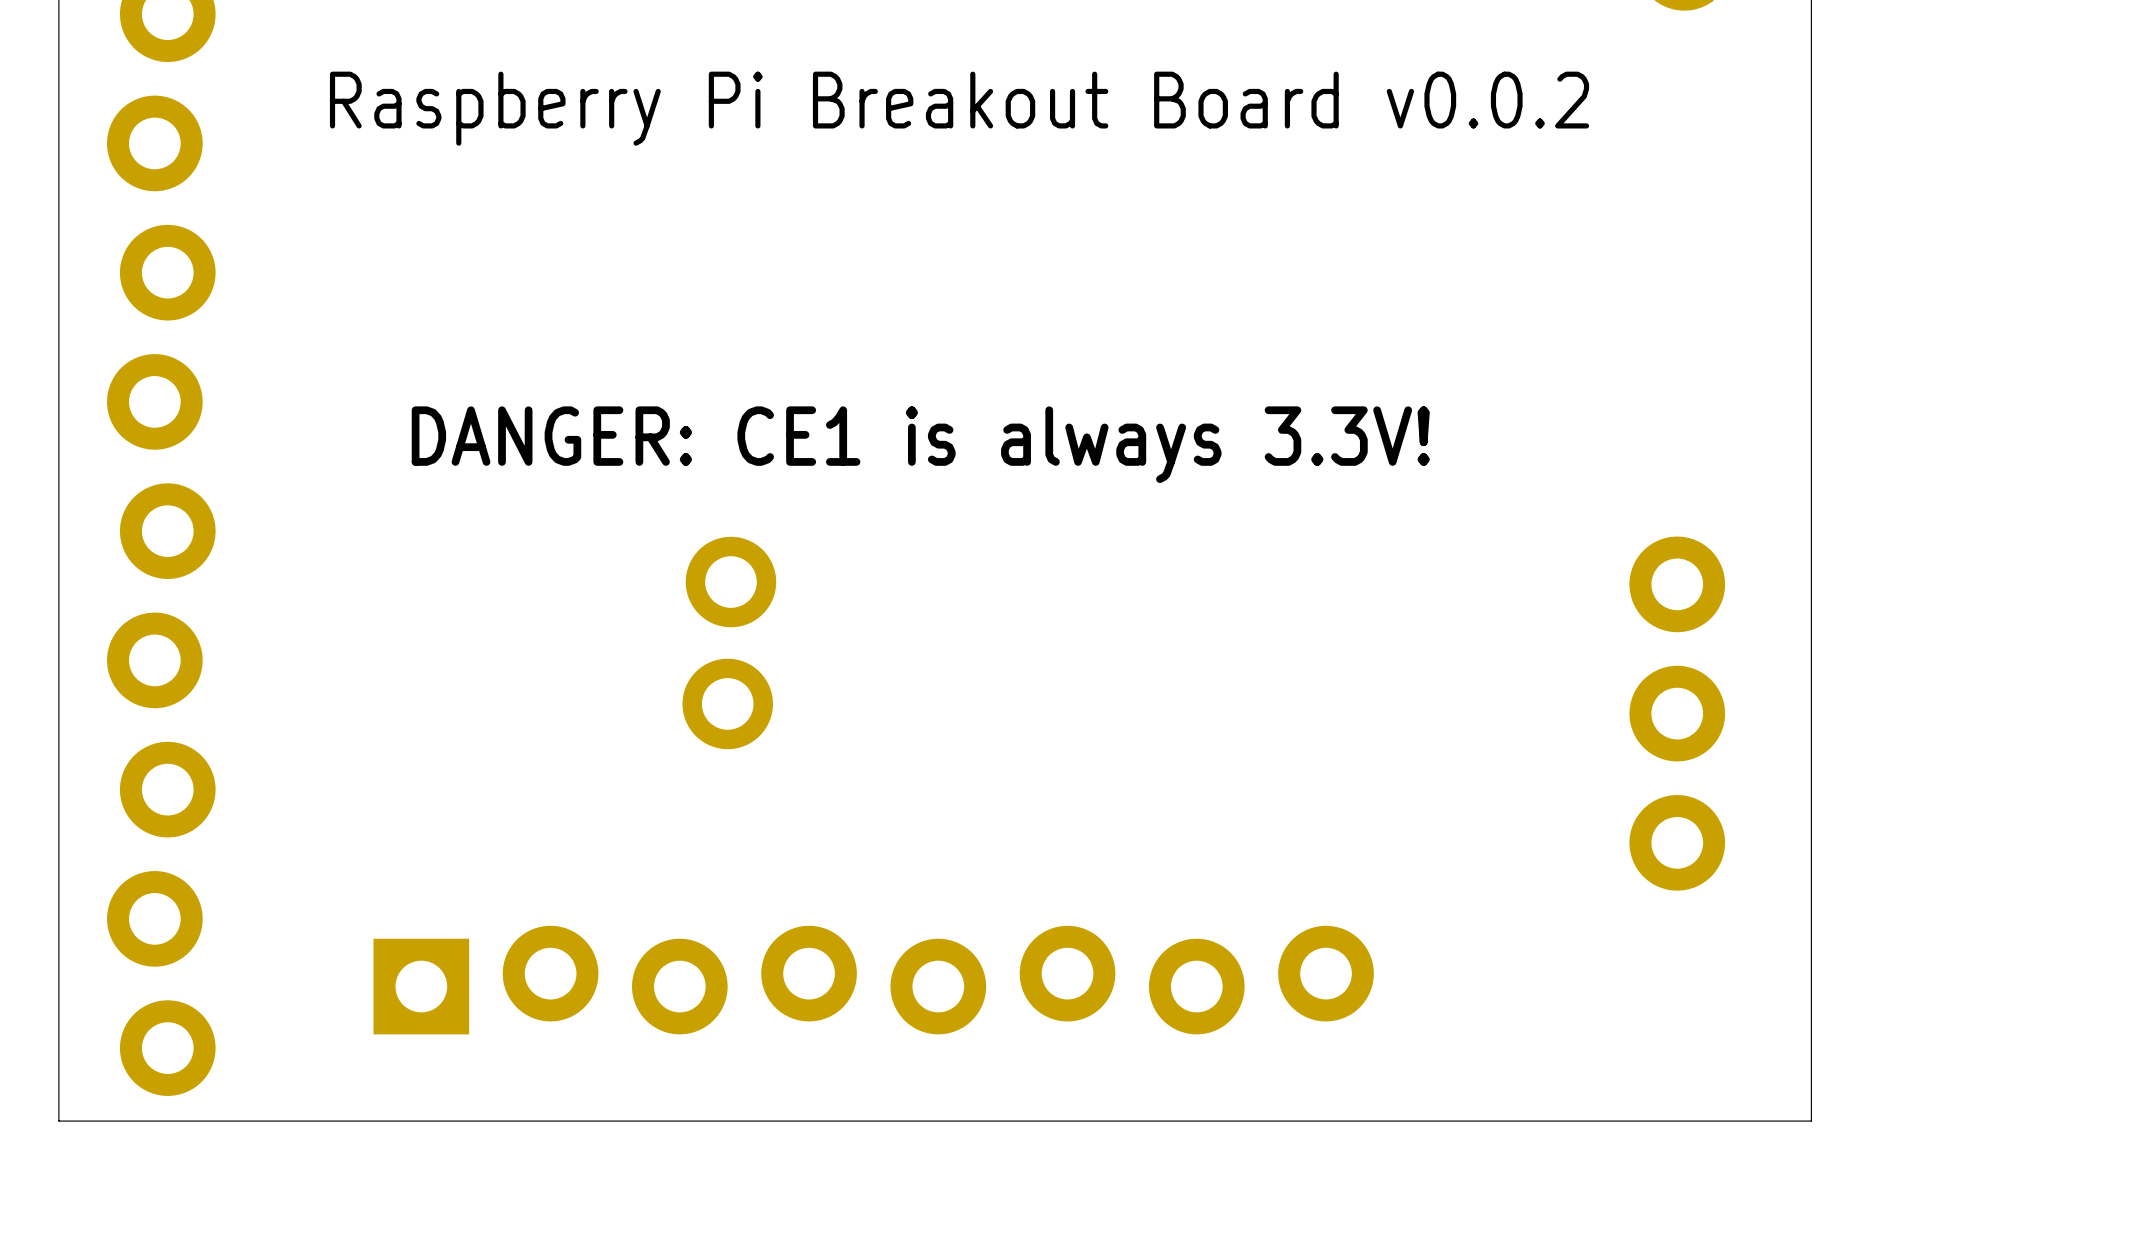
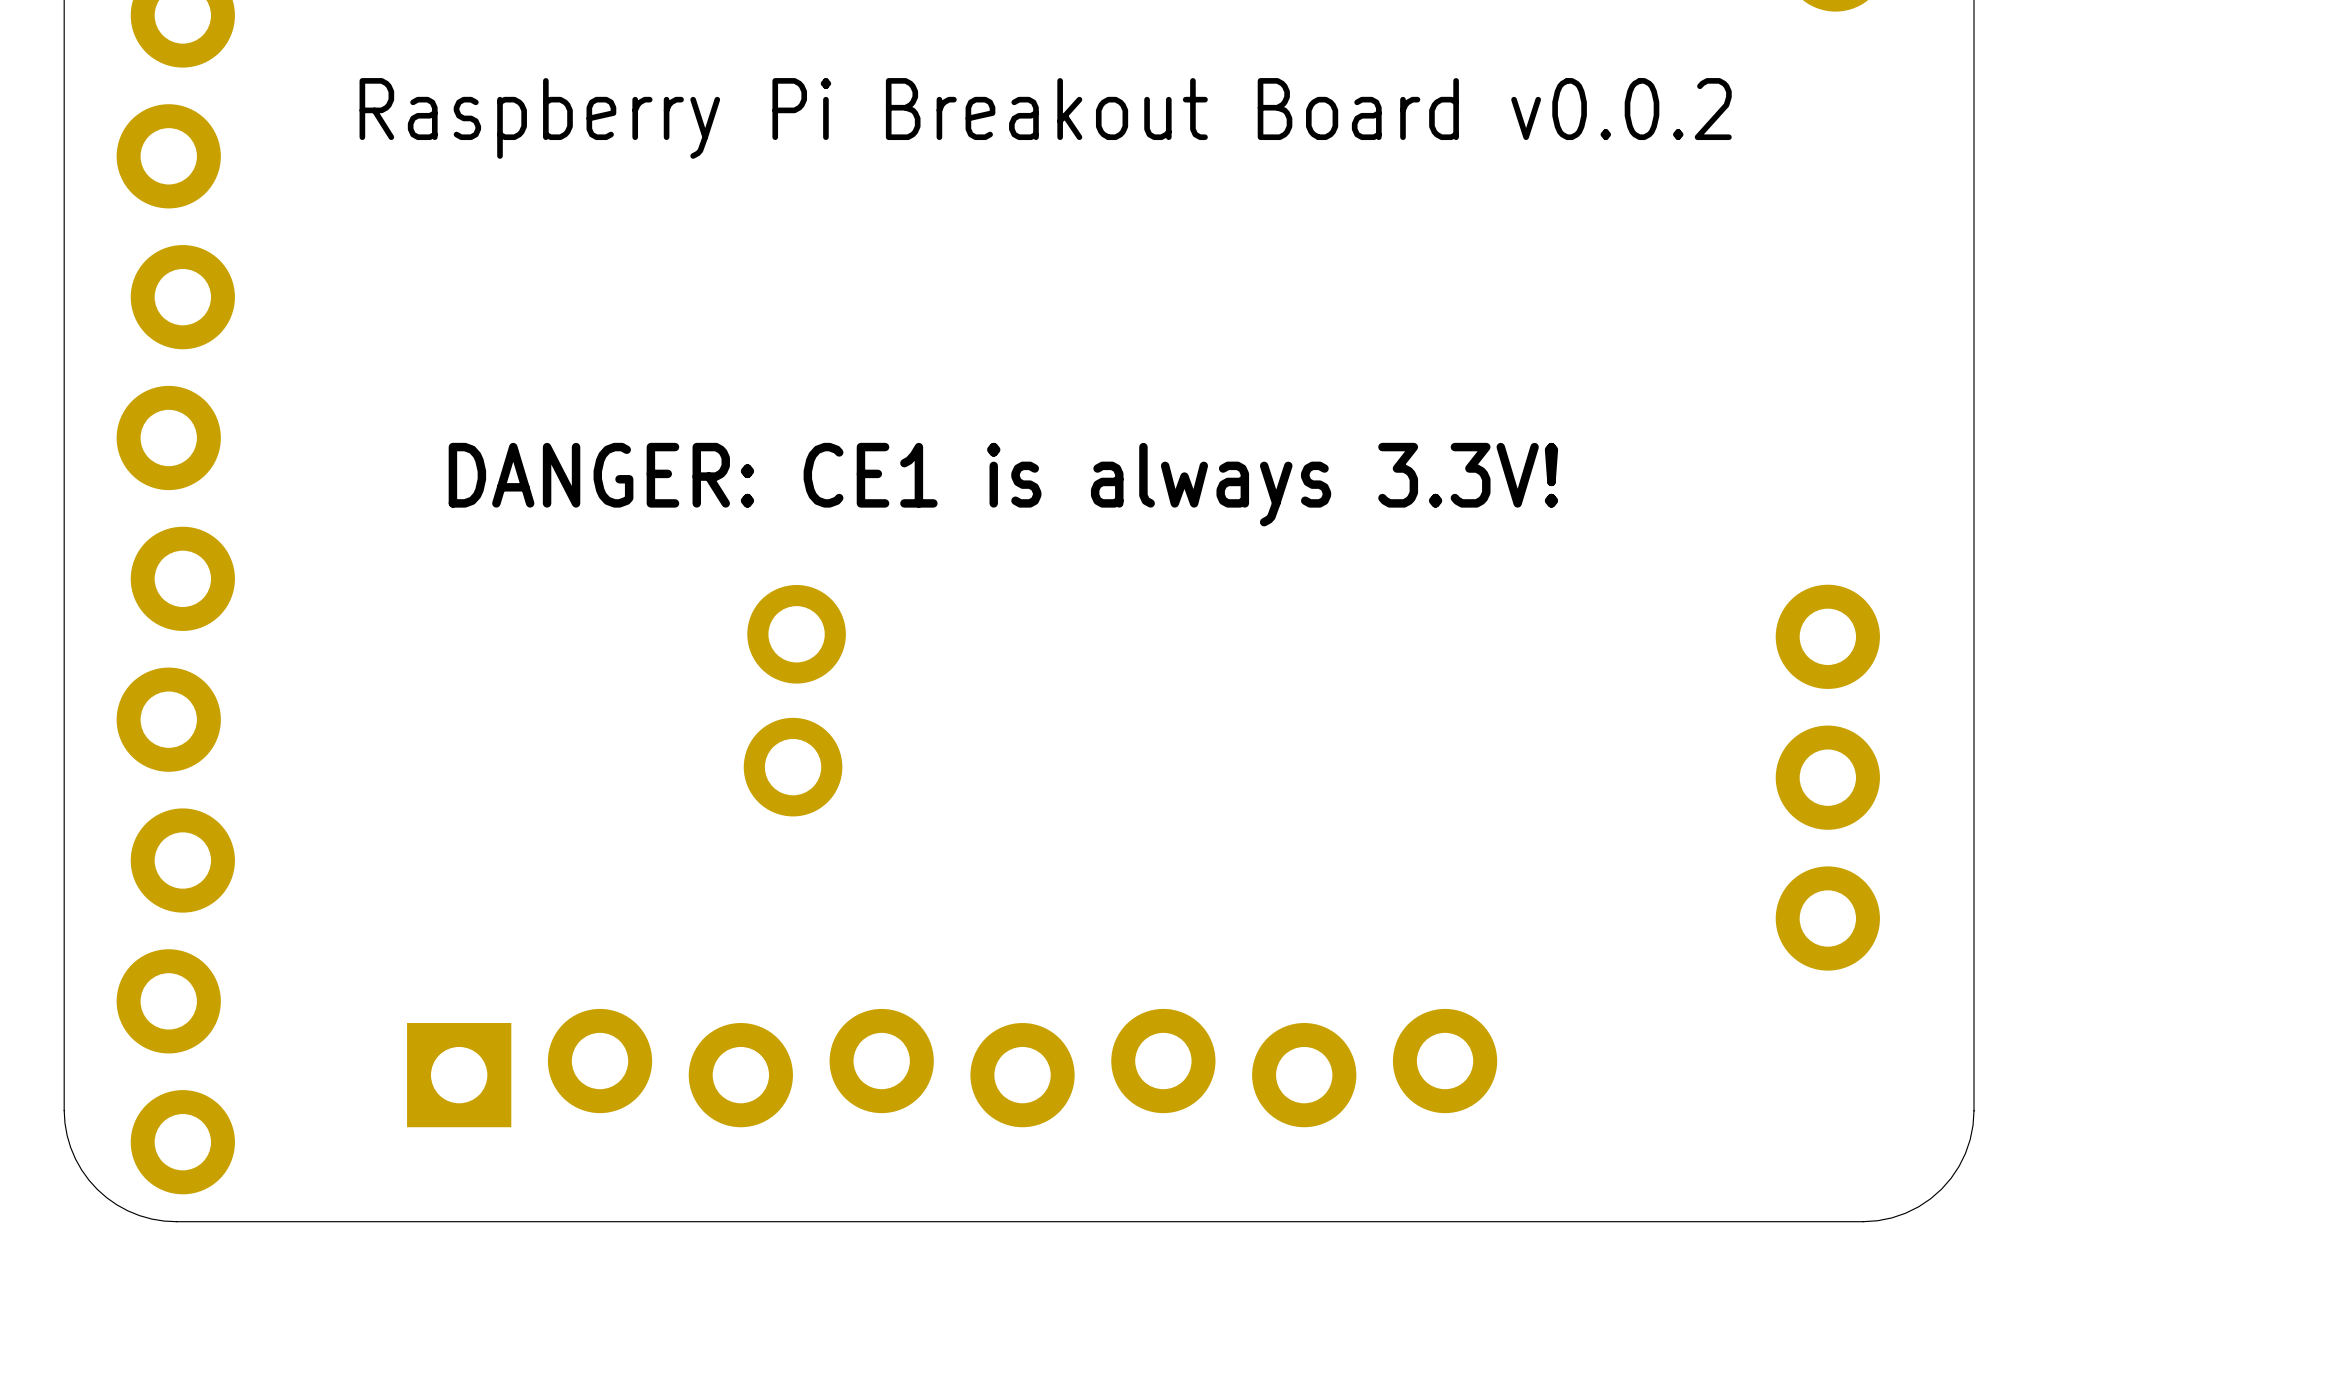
board edge: (58, 1019) (58, 1121) (162, 1121) -> (64, 1110) (70, 1147) (81, 1170) (97, 1189) (128, 1210) (151, 1219) (176, 1221)
board edge: (1811, 1019) (1811, 1121) (1709, 1121) -> (1973, 1110) (1970, 1139) (1965, 1153) (1951, 1178) (1941, 1189) (1918, 1206) (1905, 1213) (1877, 1220) (1863, 1221)

